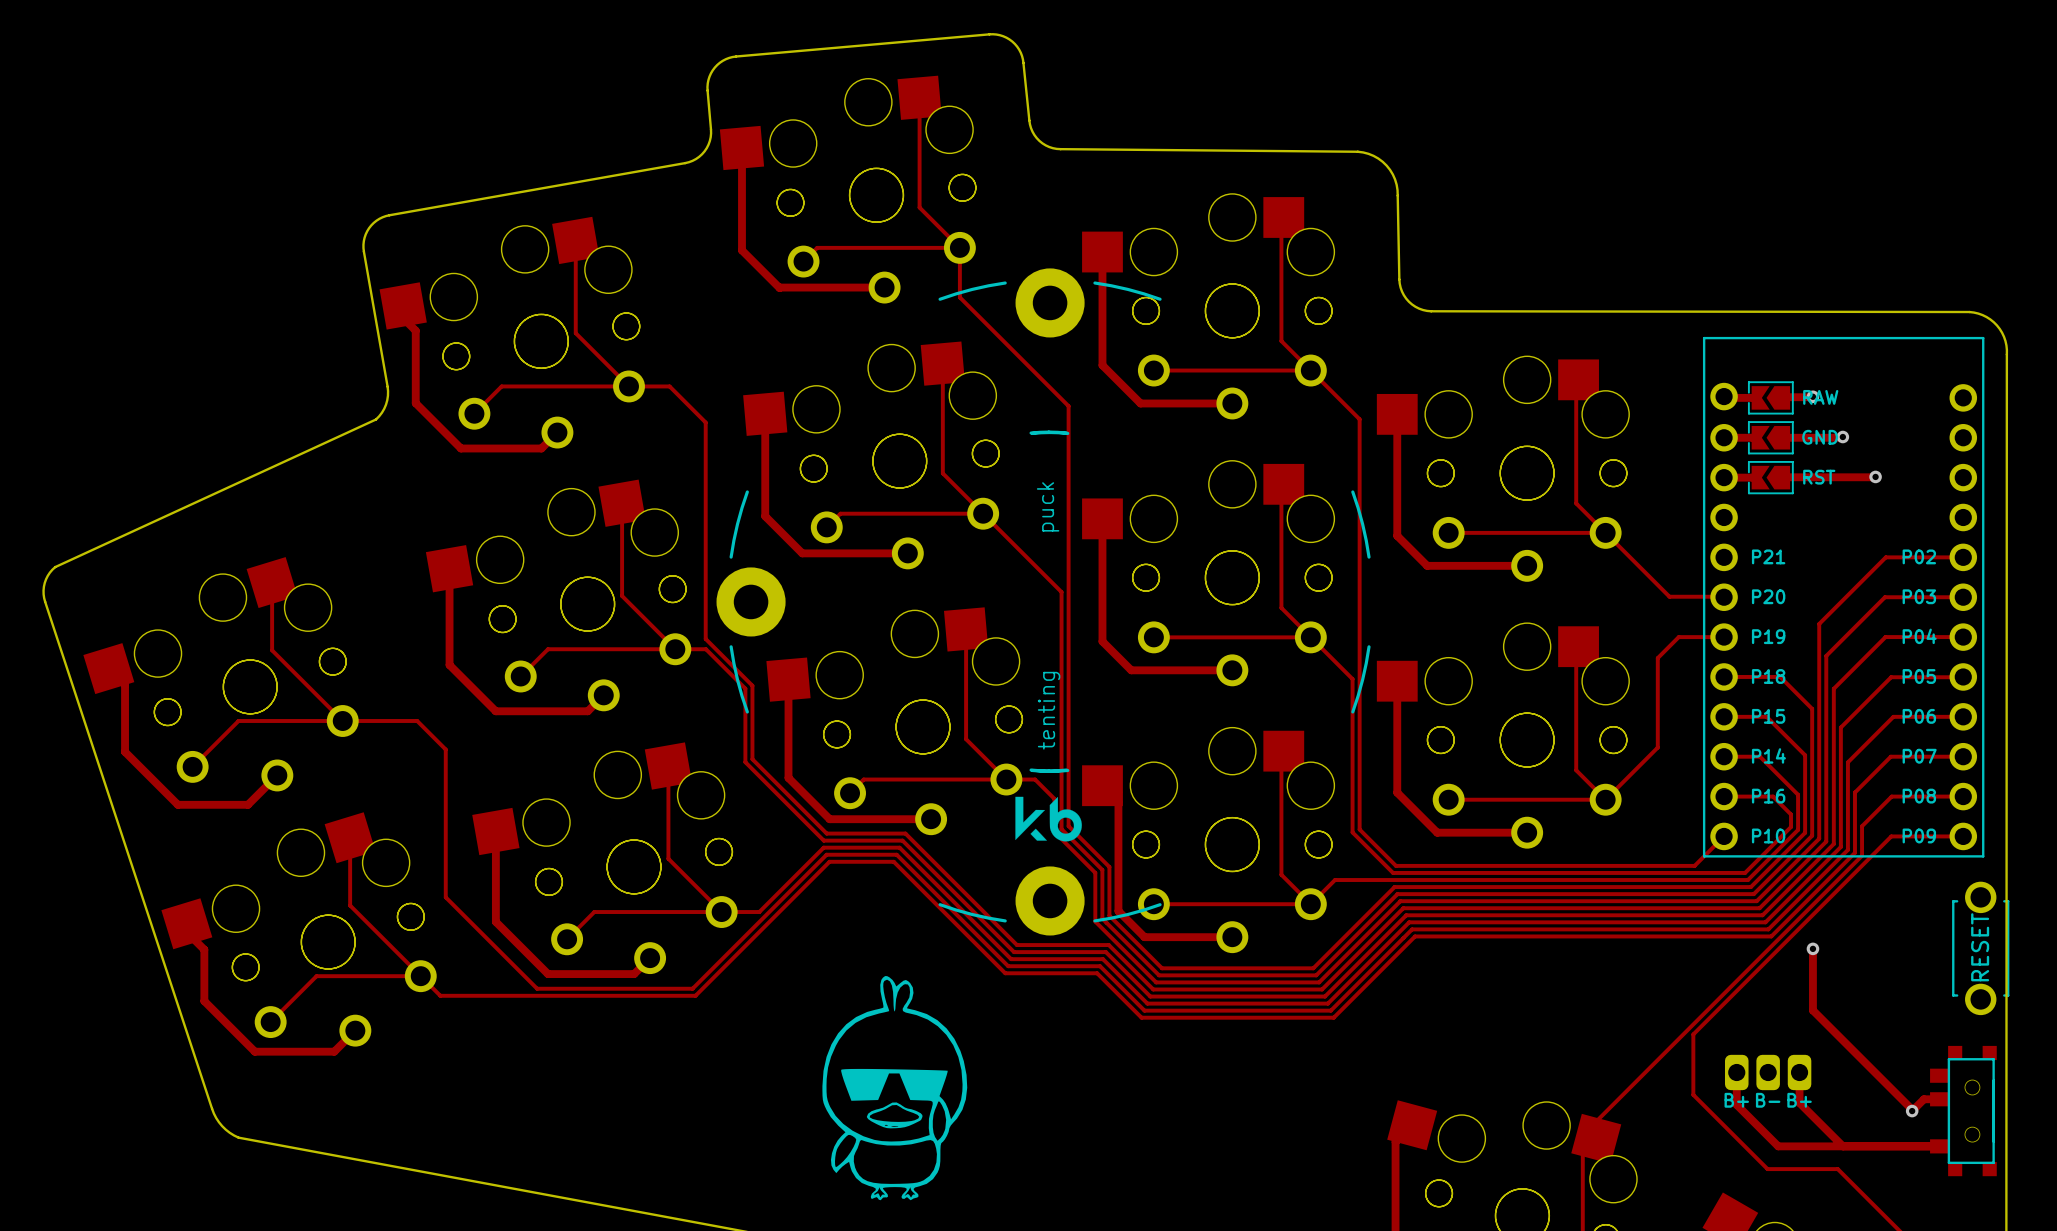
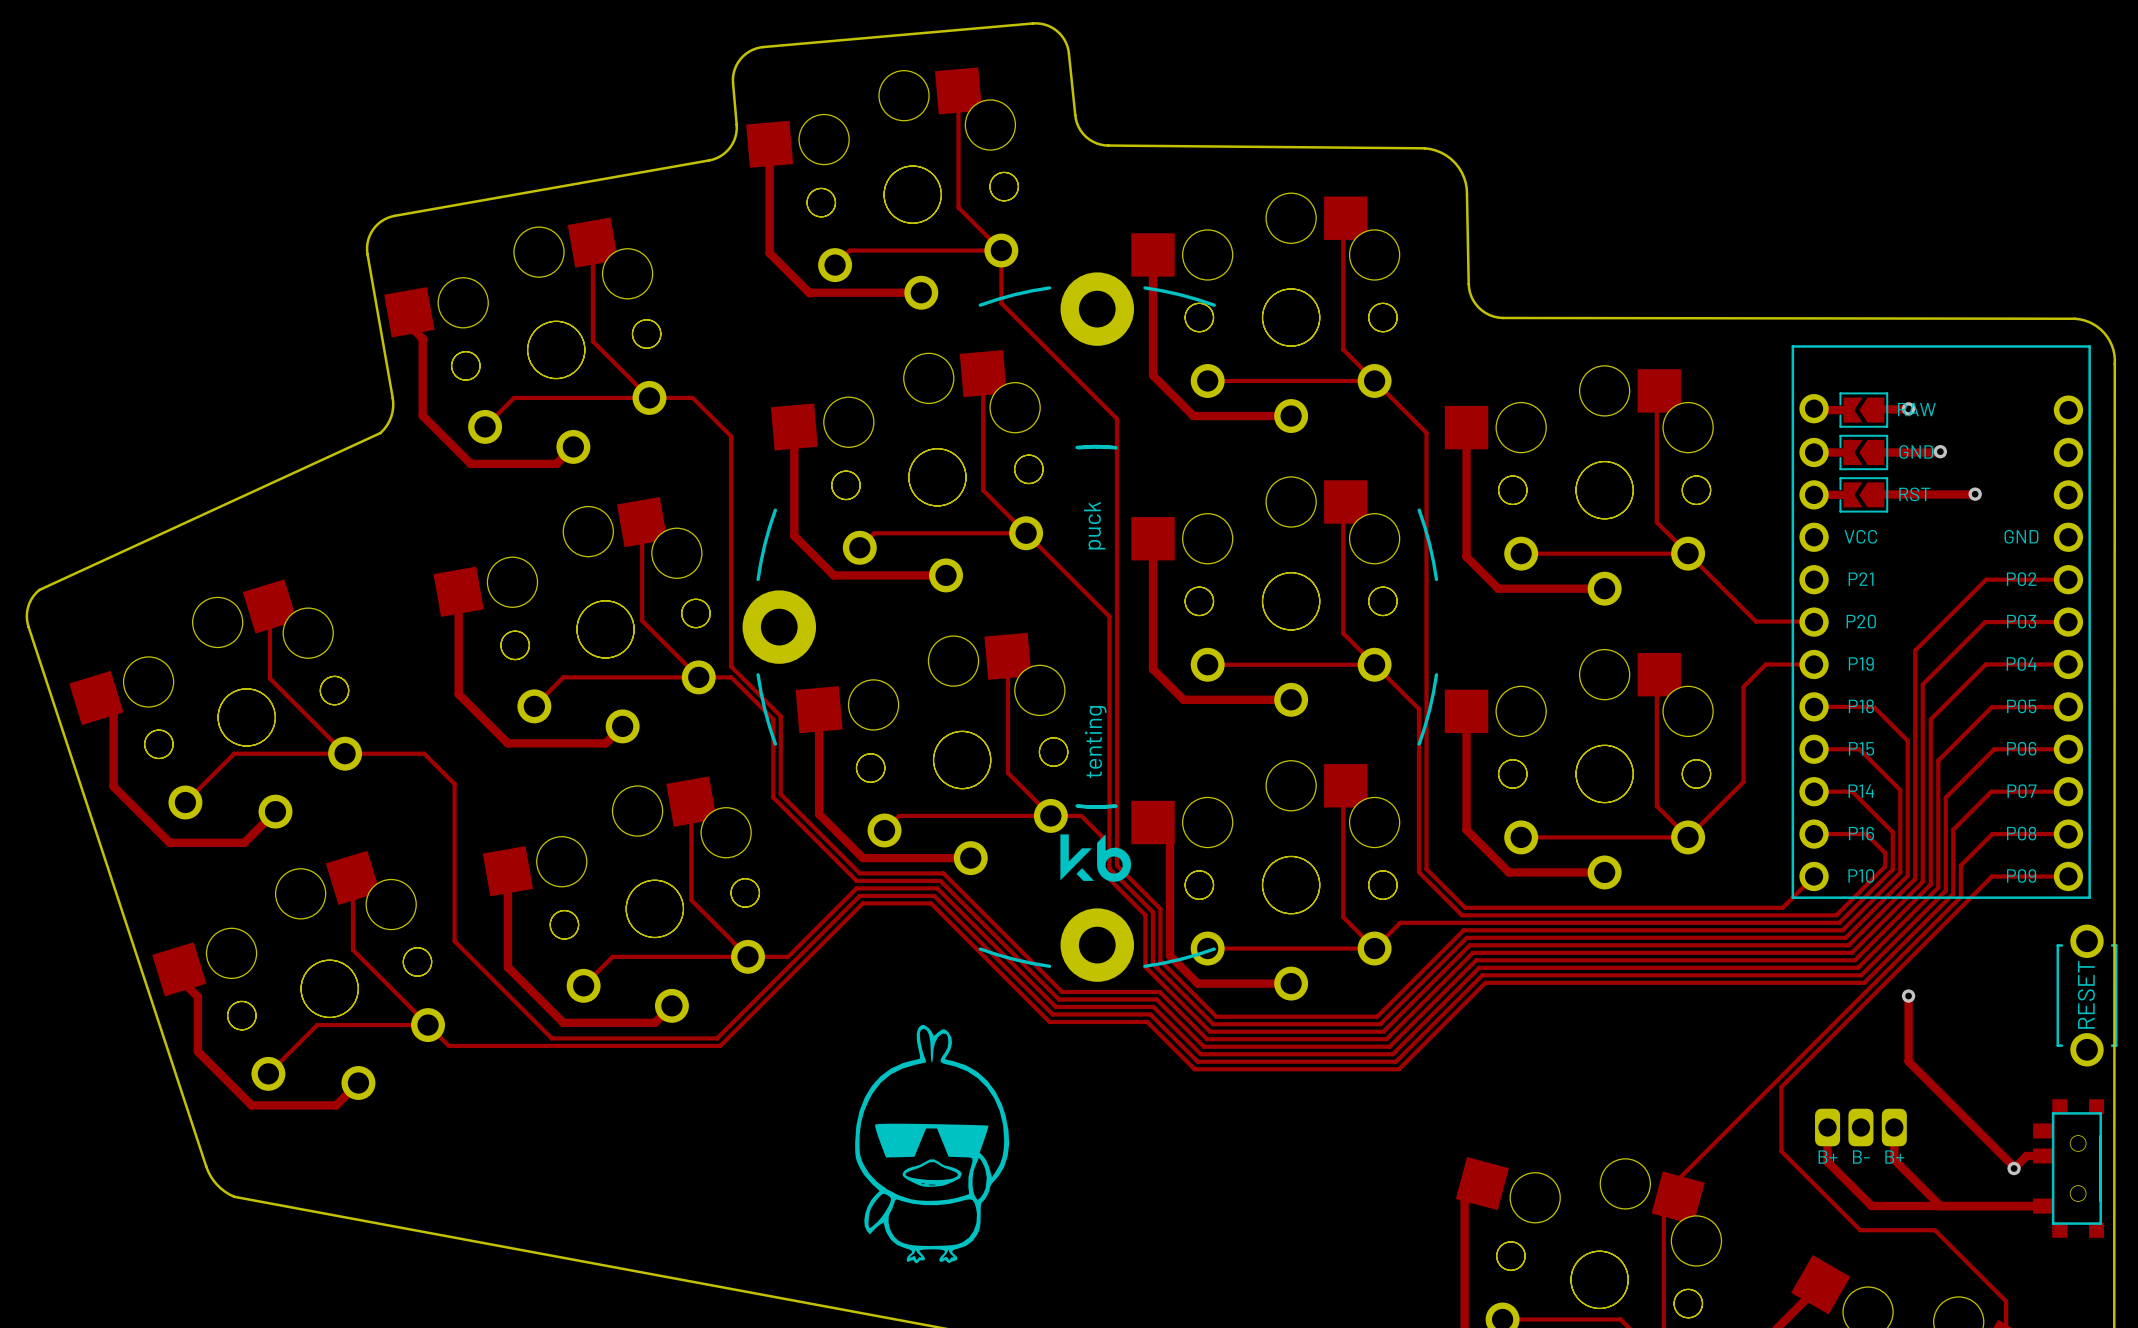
part text: none -> VCC (1860, 536)
part text: none -> GND (2021, 536)

